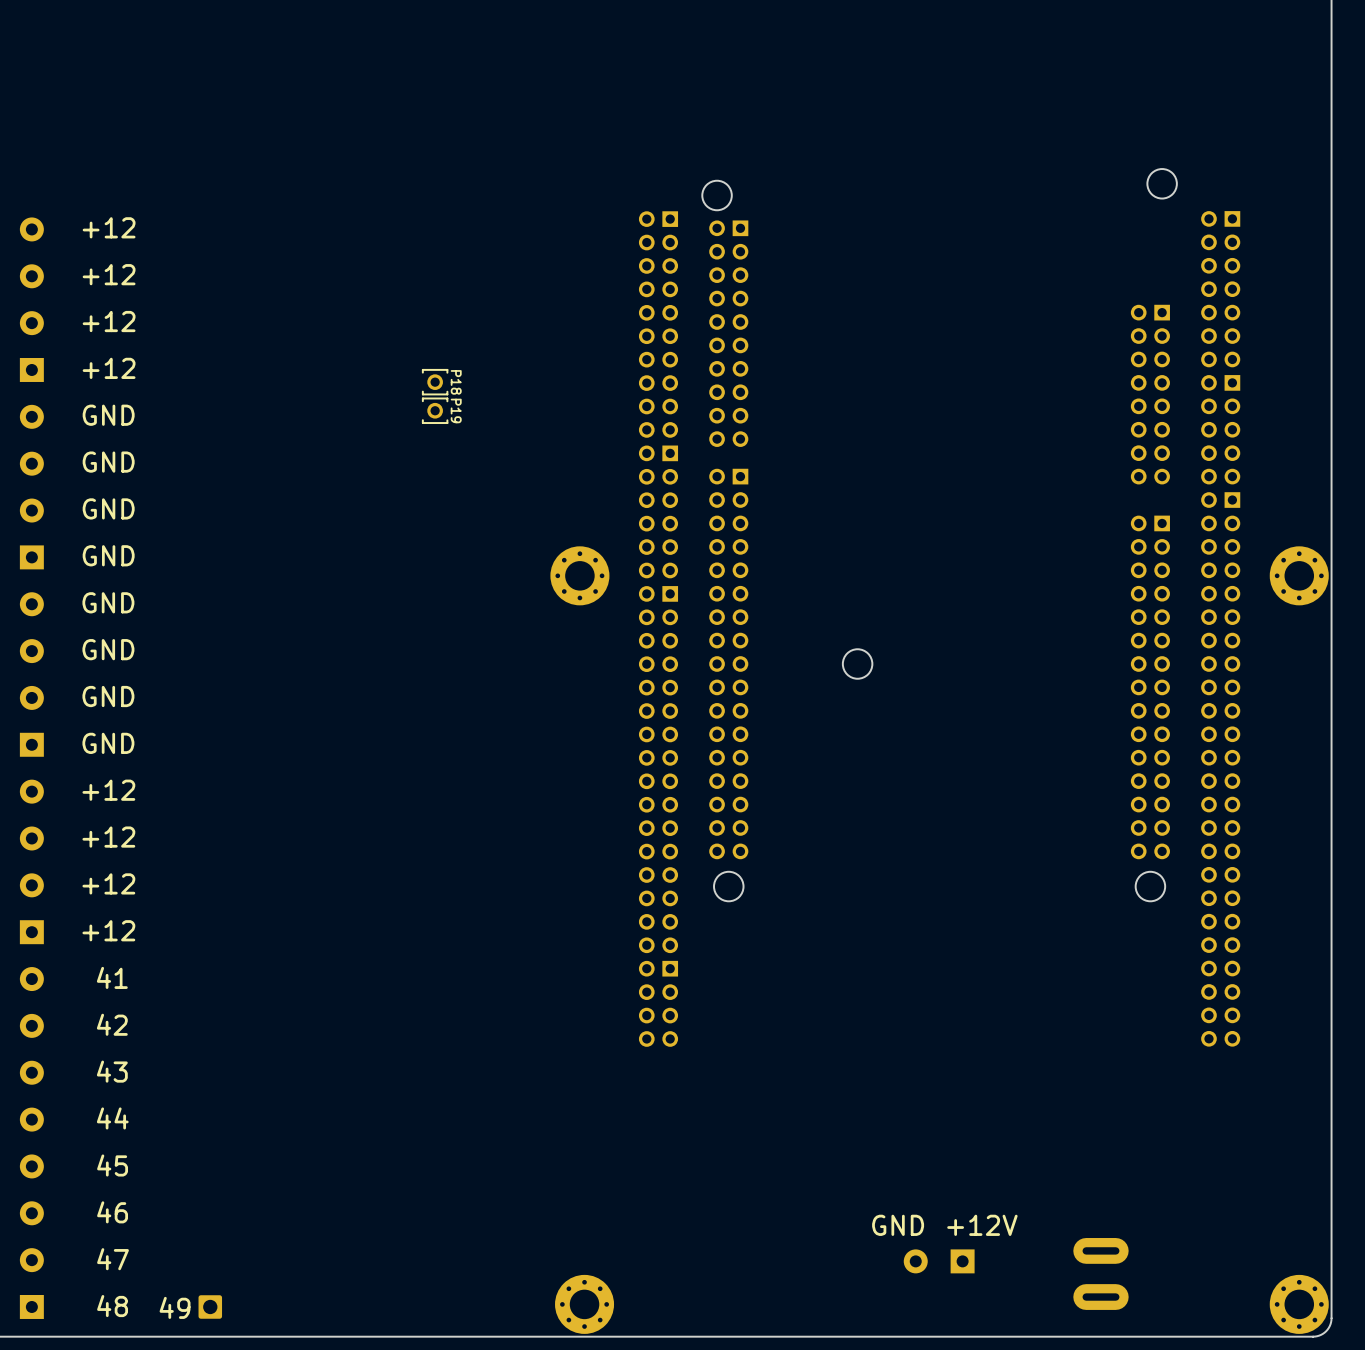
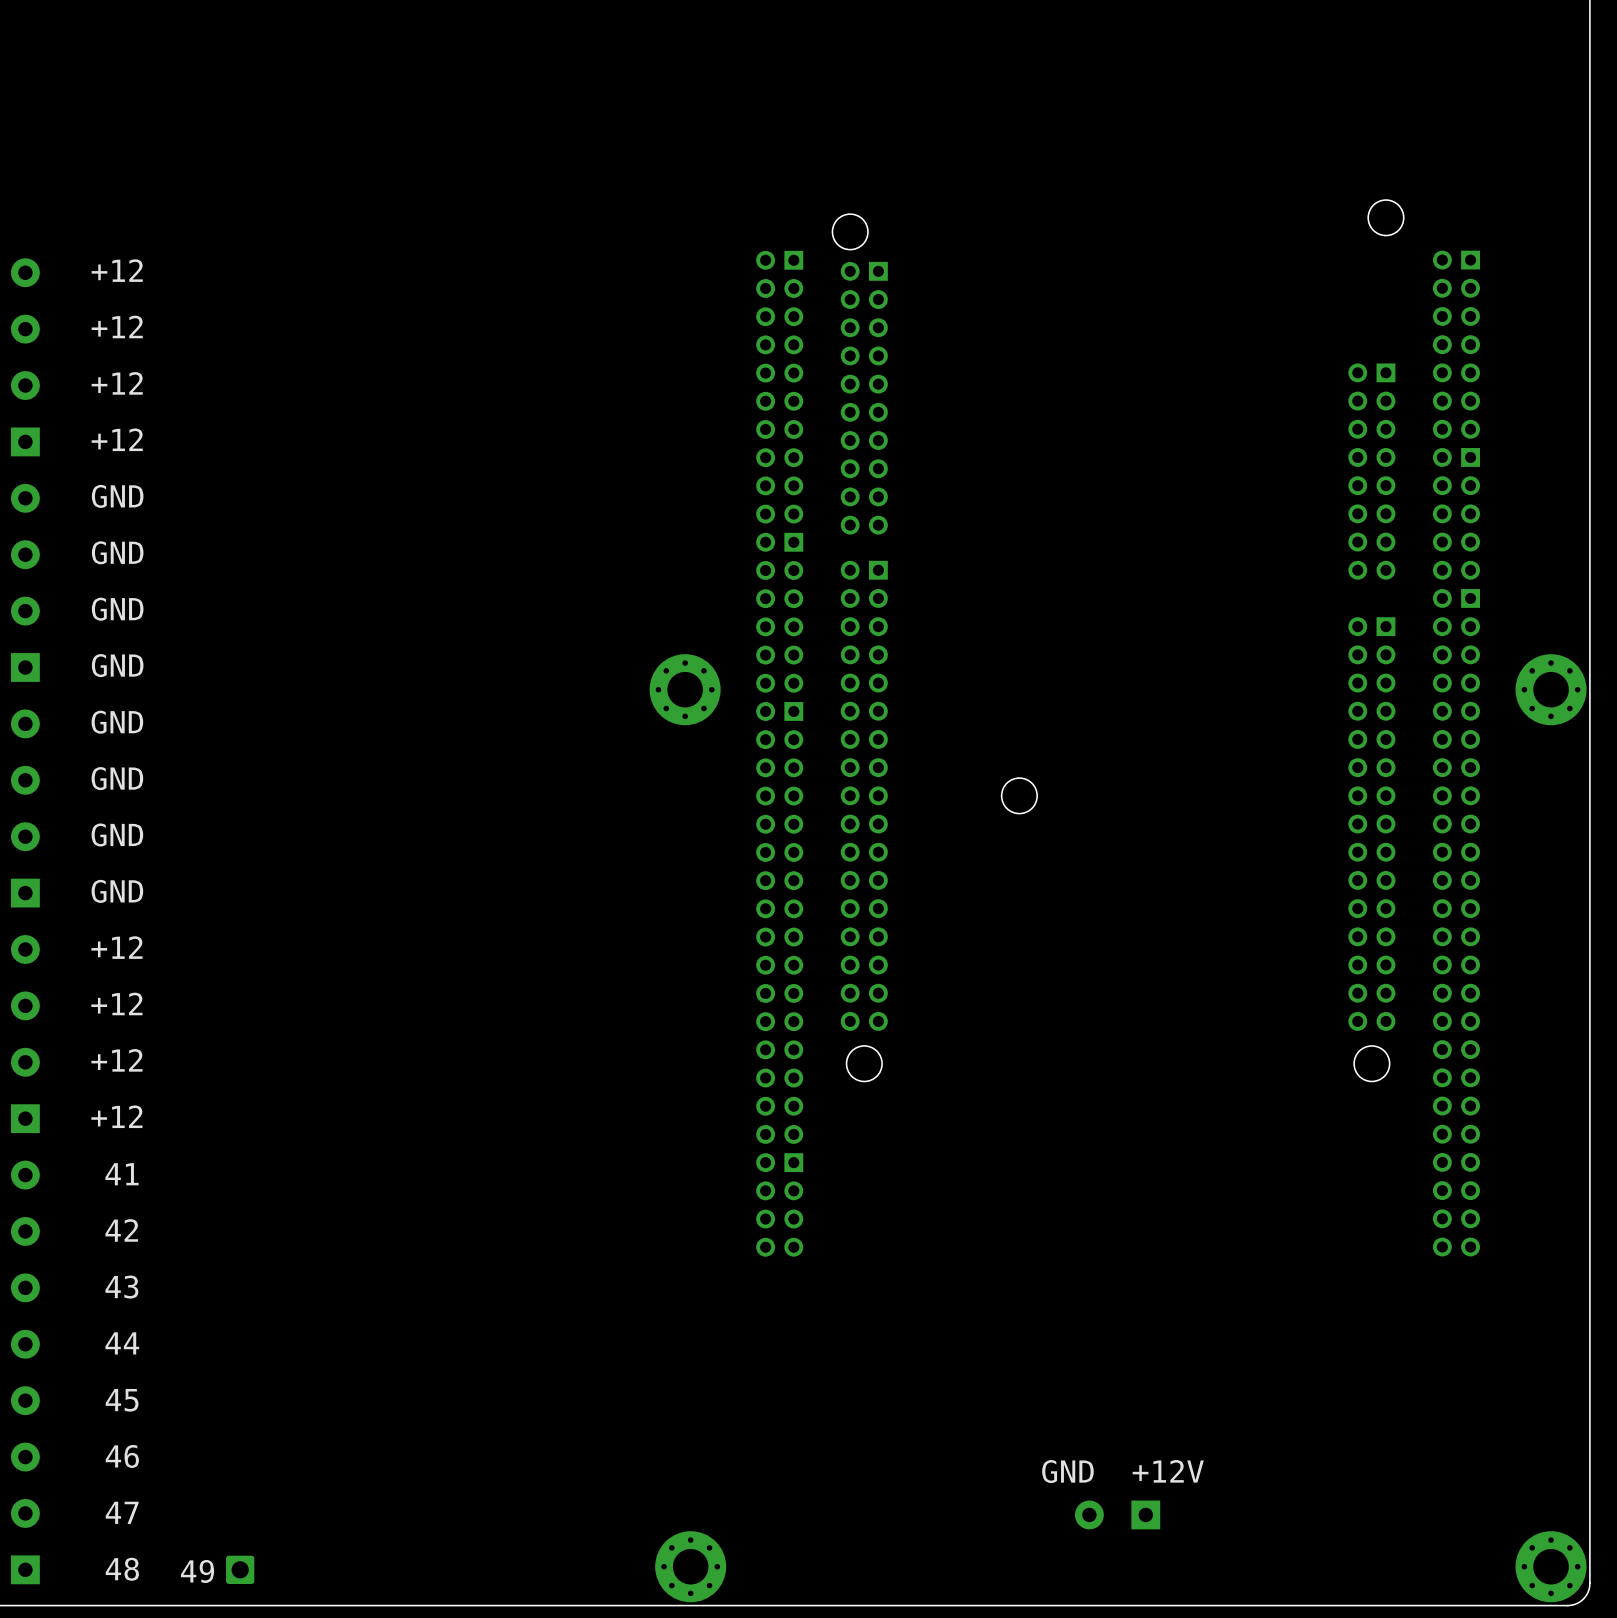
P18: (435, 382) -> none
P19: (435, 410) -> none
part: (1100, 1273) -> none

